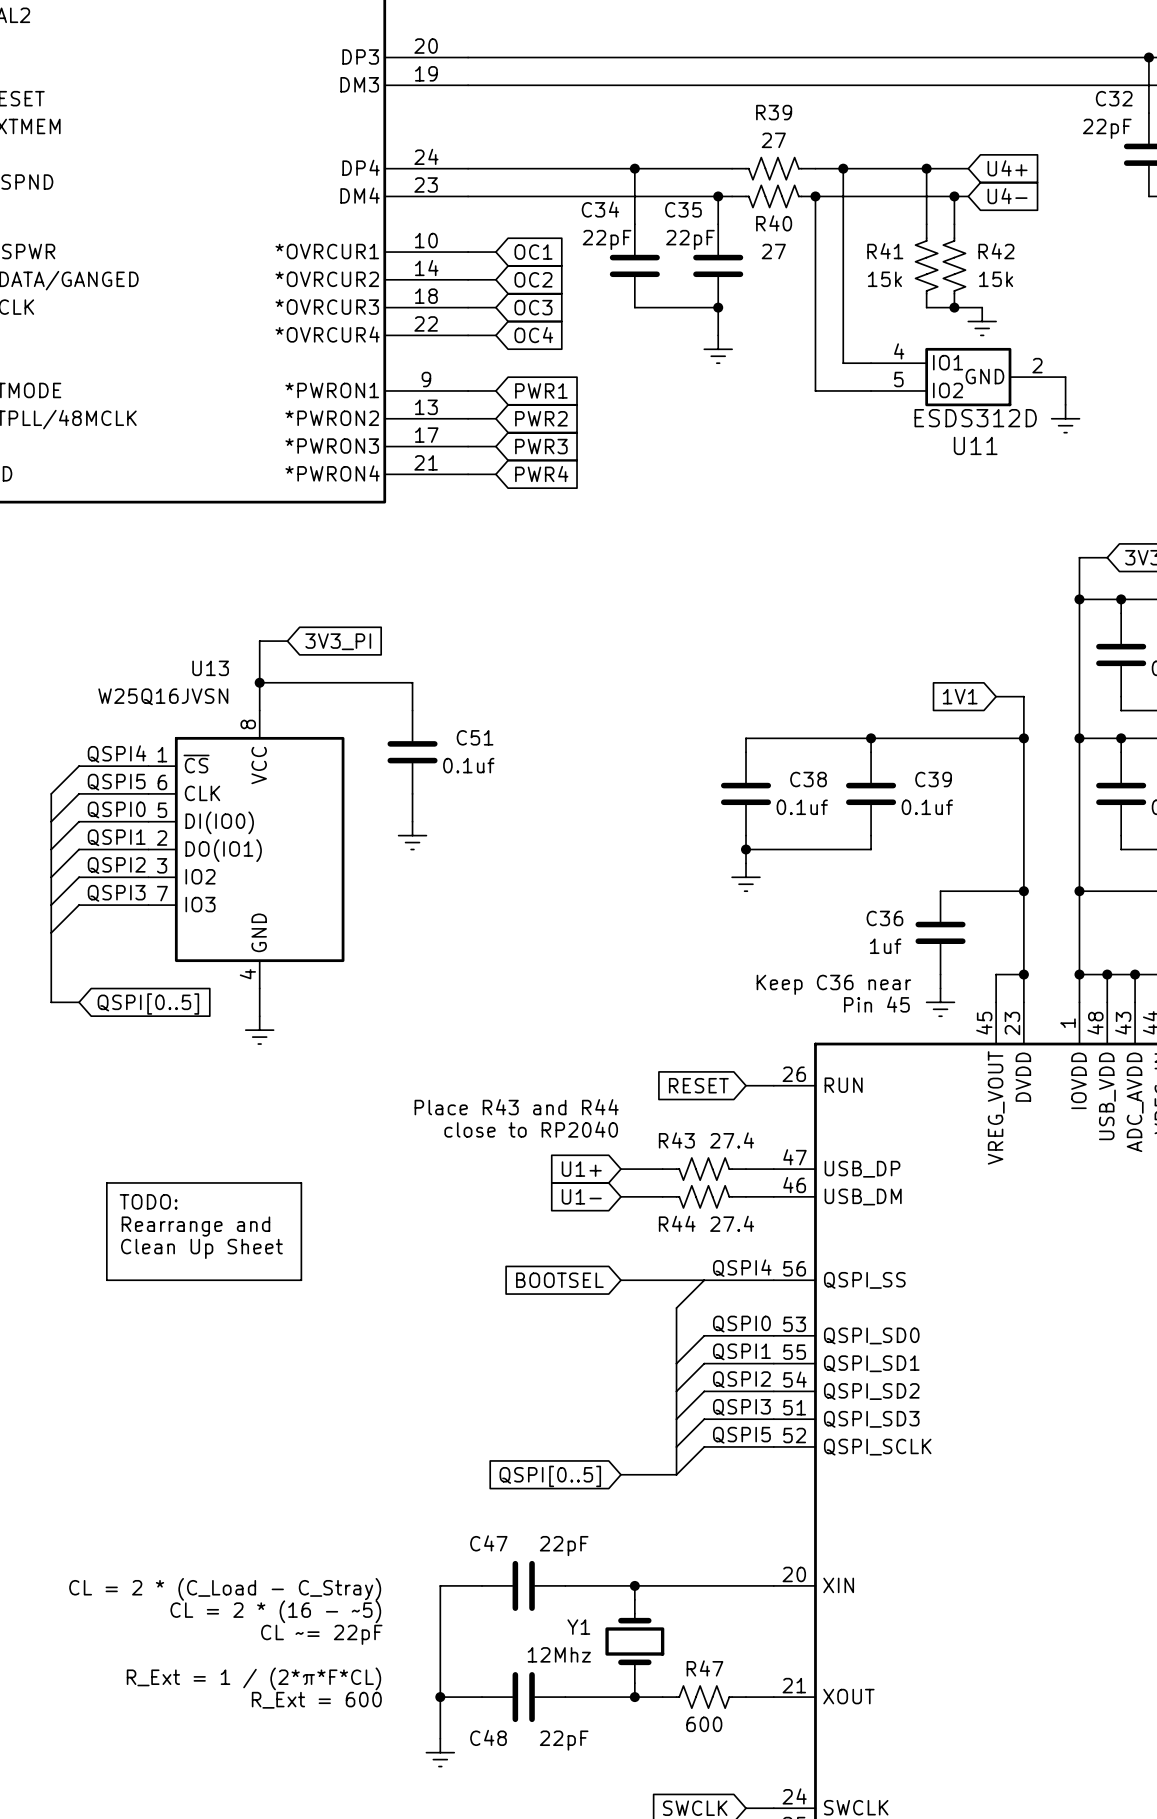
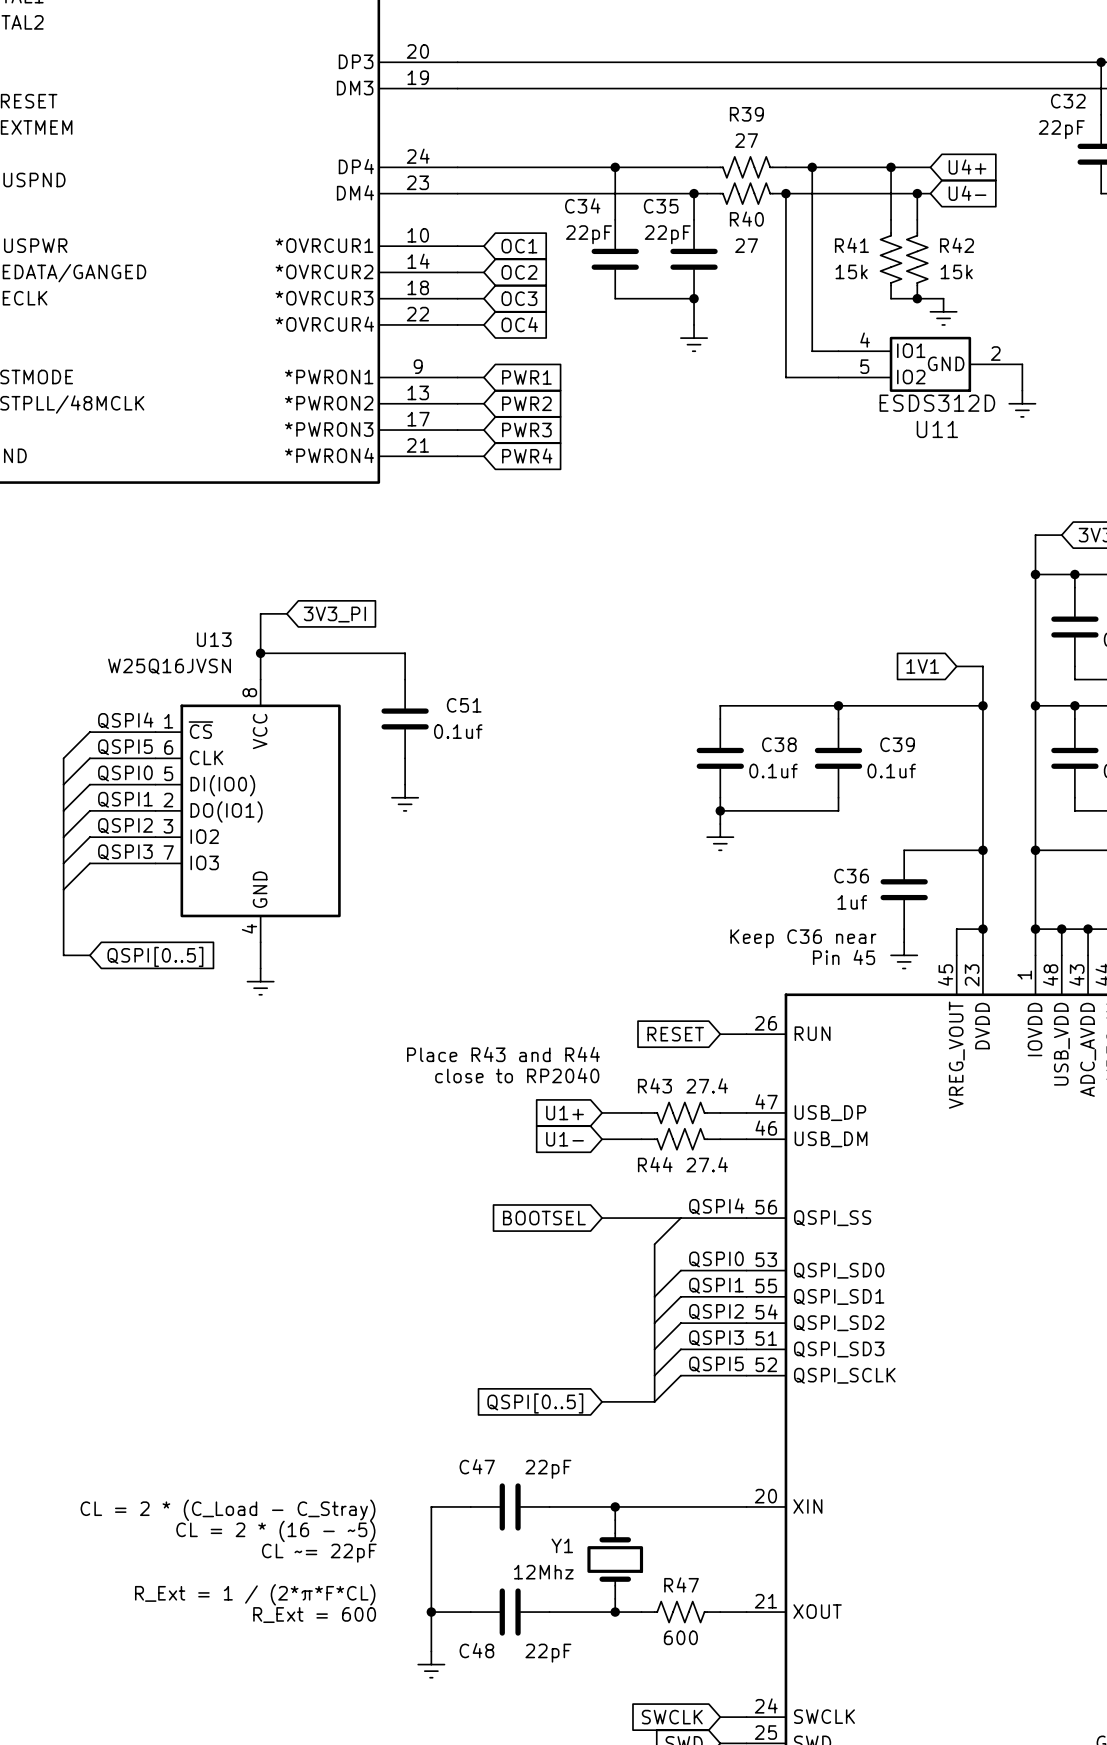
line: (106, 1182) (301, 1182) (301, 1280) (106, 1280) (106, 1182) -> none
text: TODO: (148, 1201) -> none
text: Rearrange and (195, 1226) -> none
text: Clean Up Sheet (201, 1248) -> none

